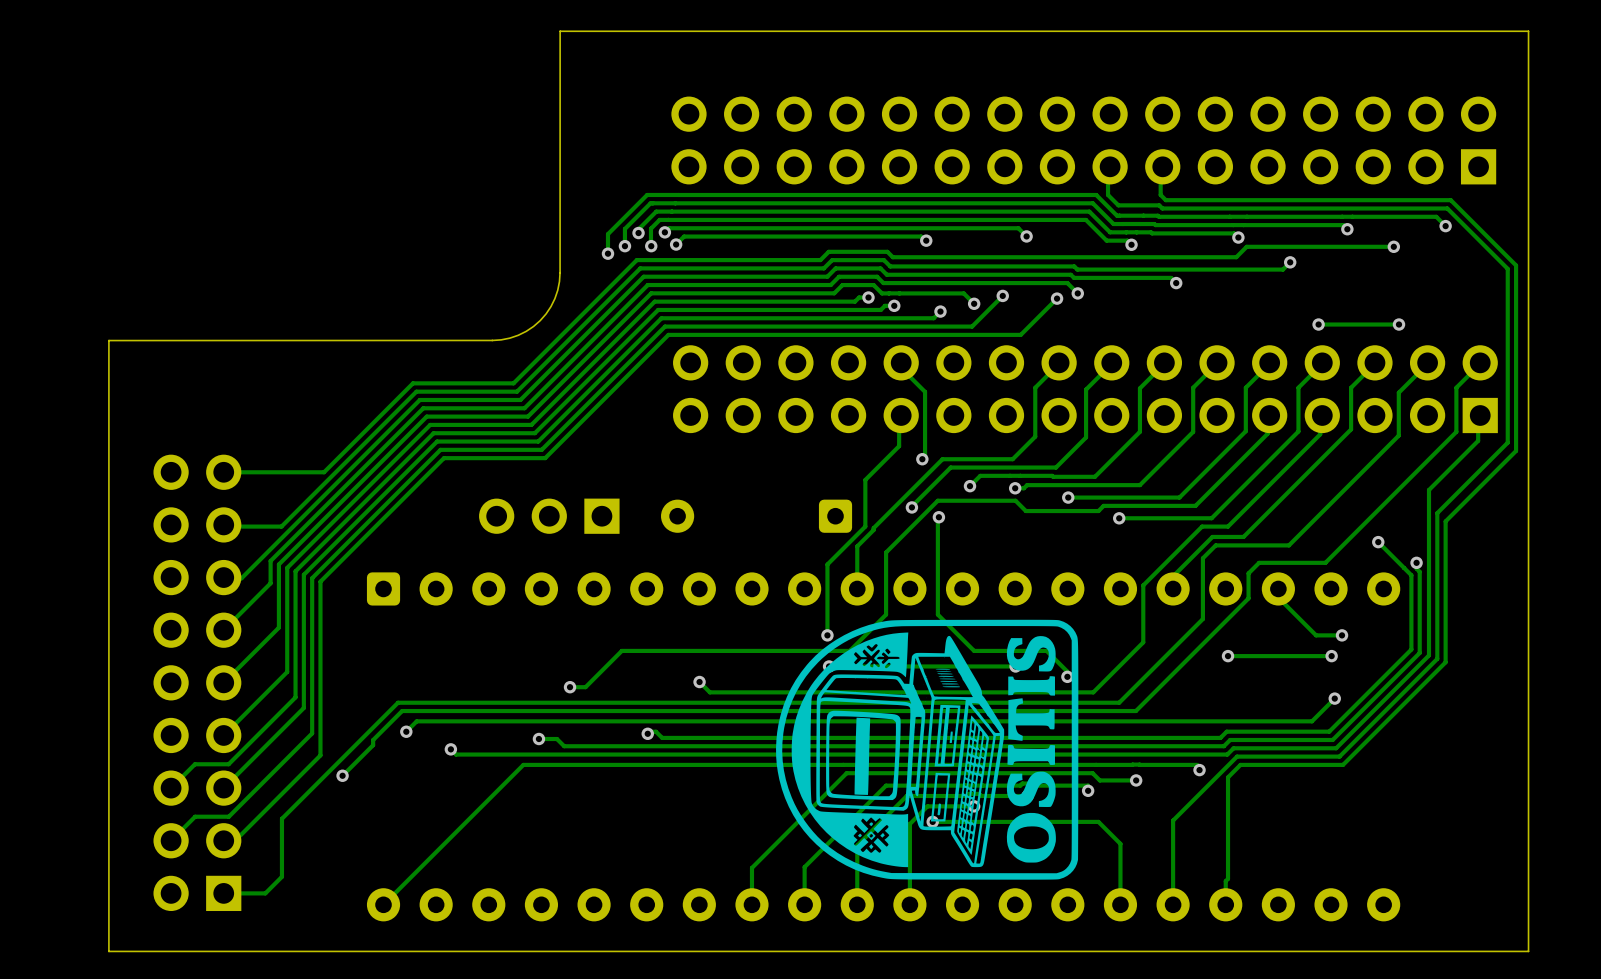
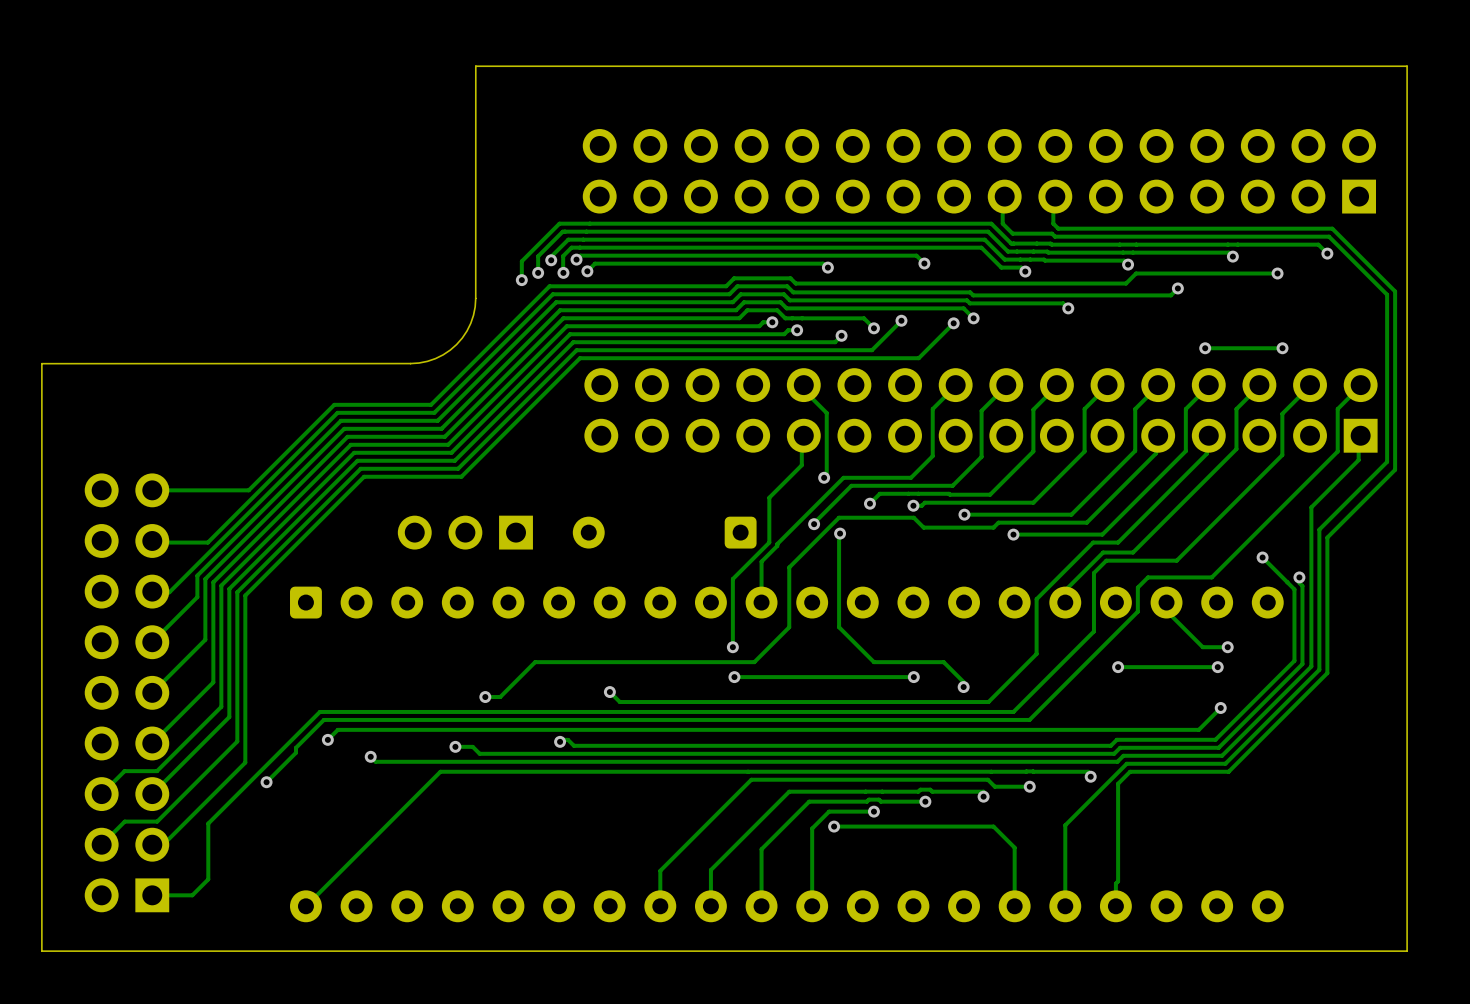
drawing: [776, 619, 1079, 880] -> none

